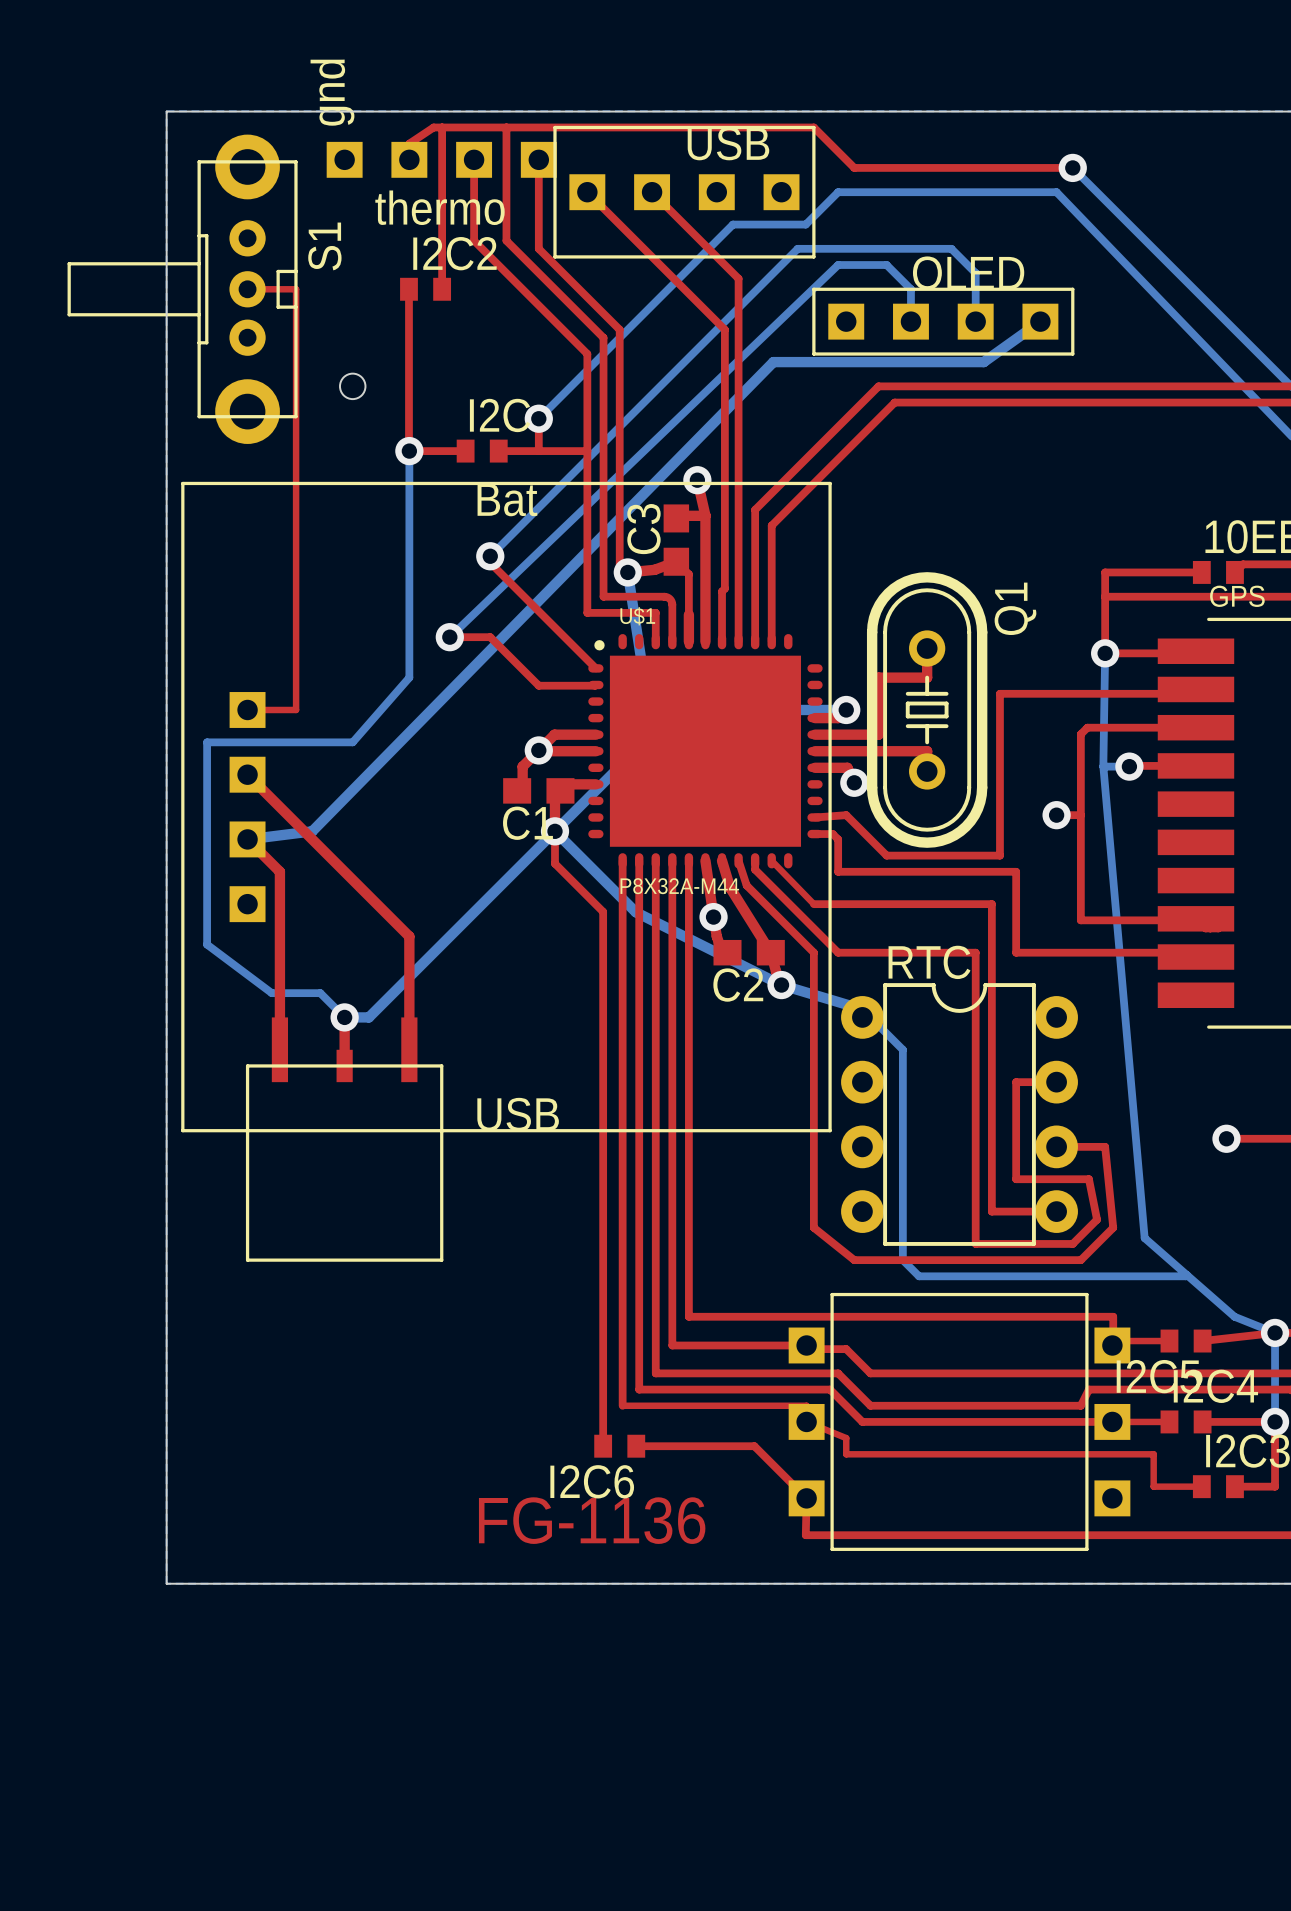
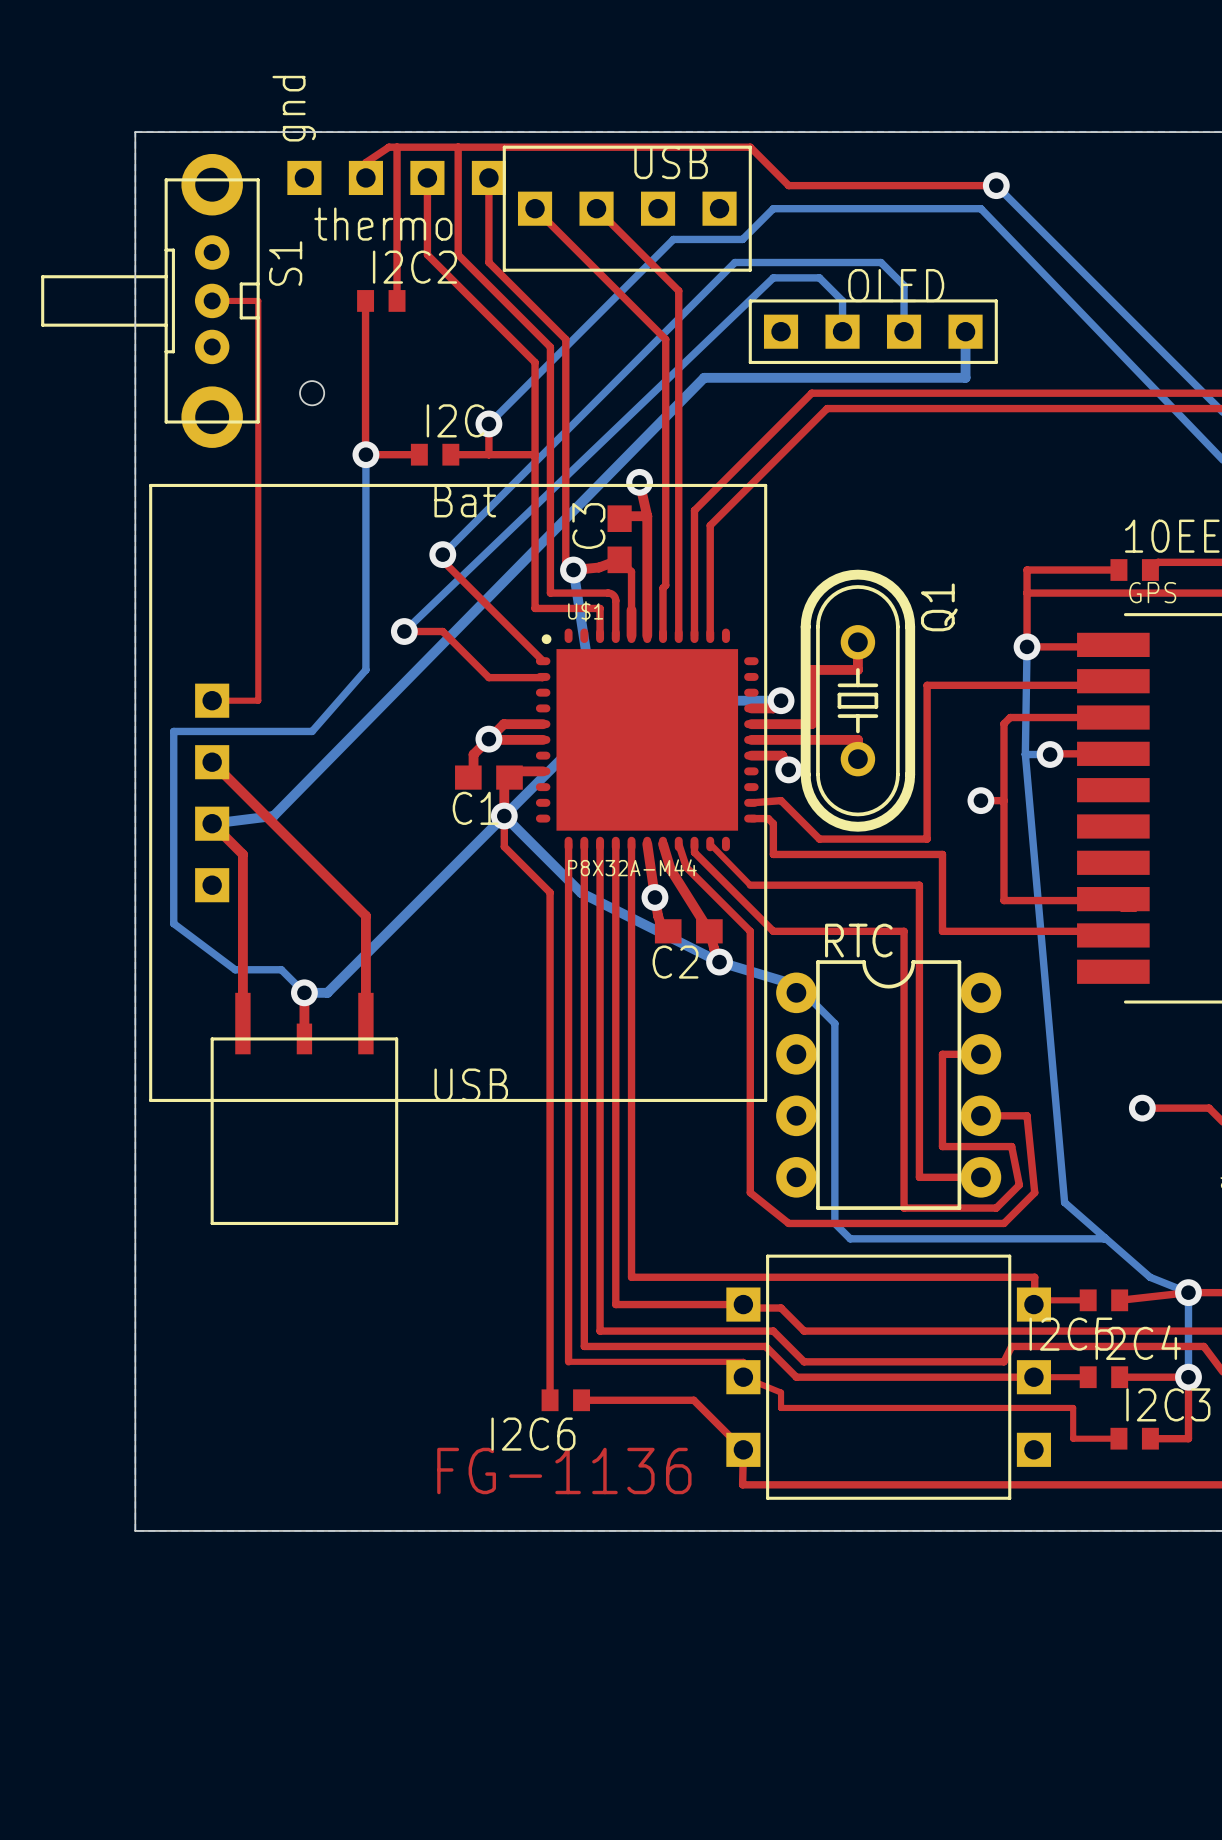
bottom track: (1040, 321) (983, 362) (773, 362) (312, 831) -> (965, 331) (965, 377) (704, 377) (273, 816)

